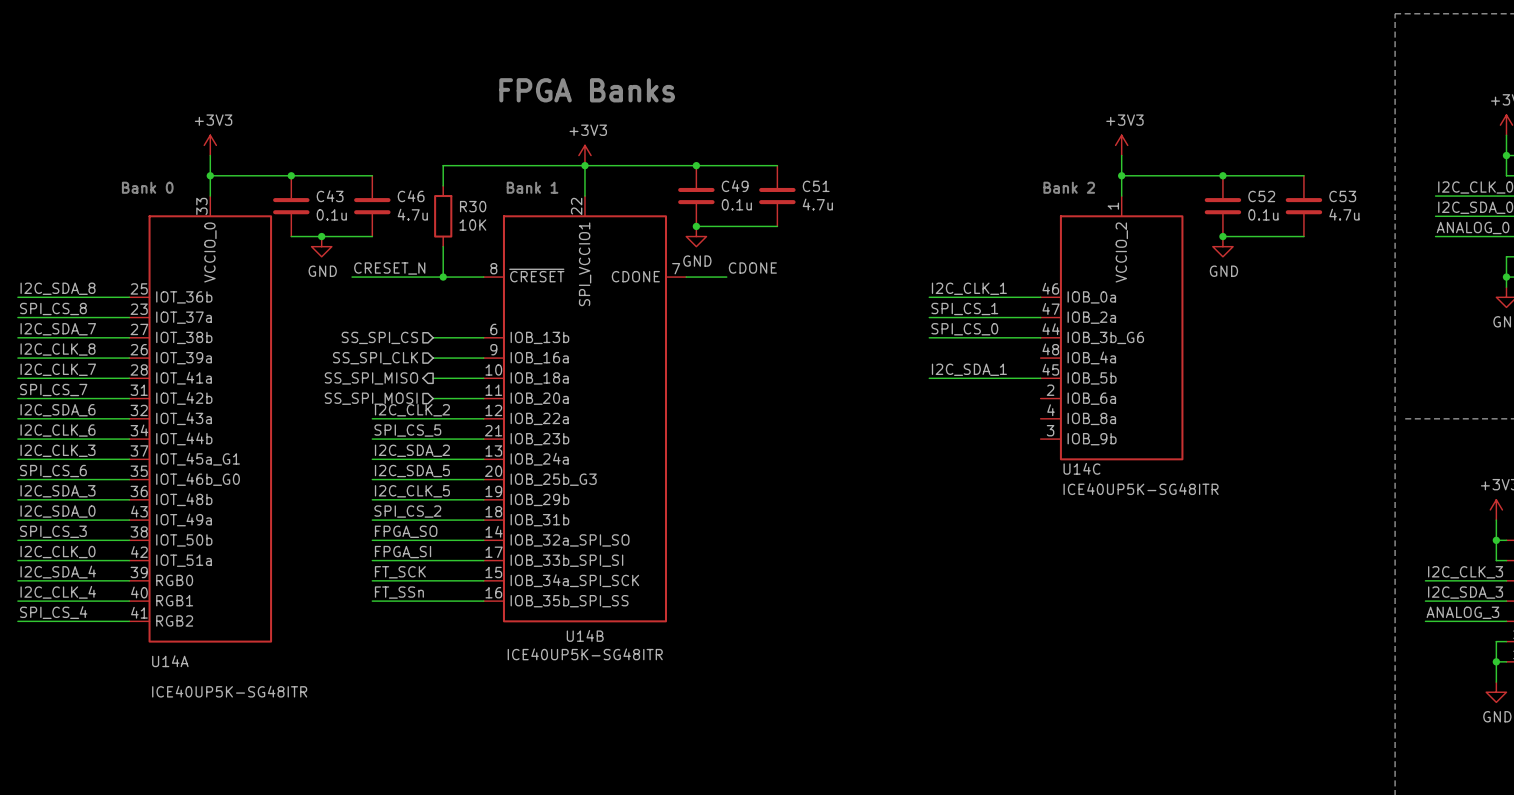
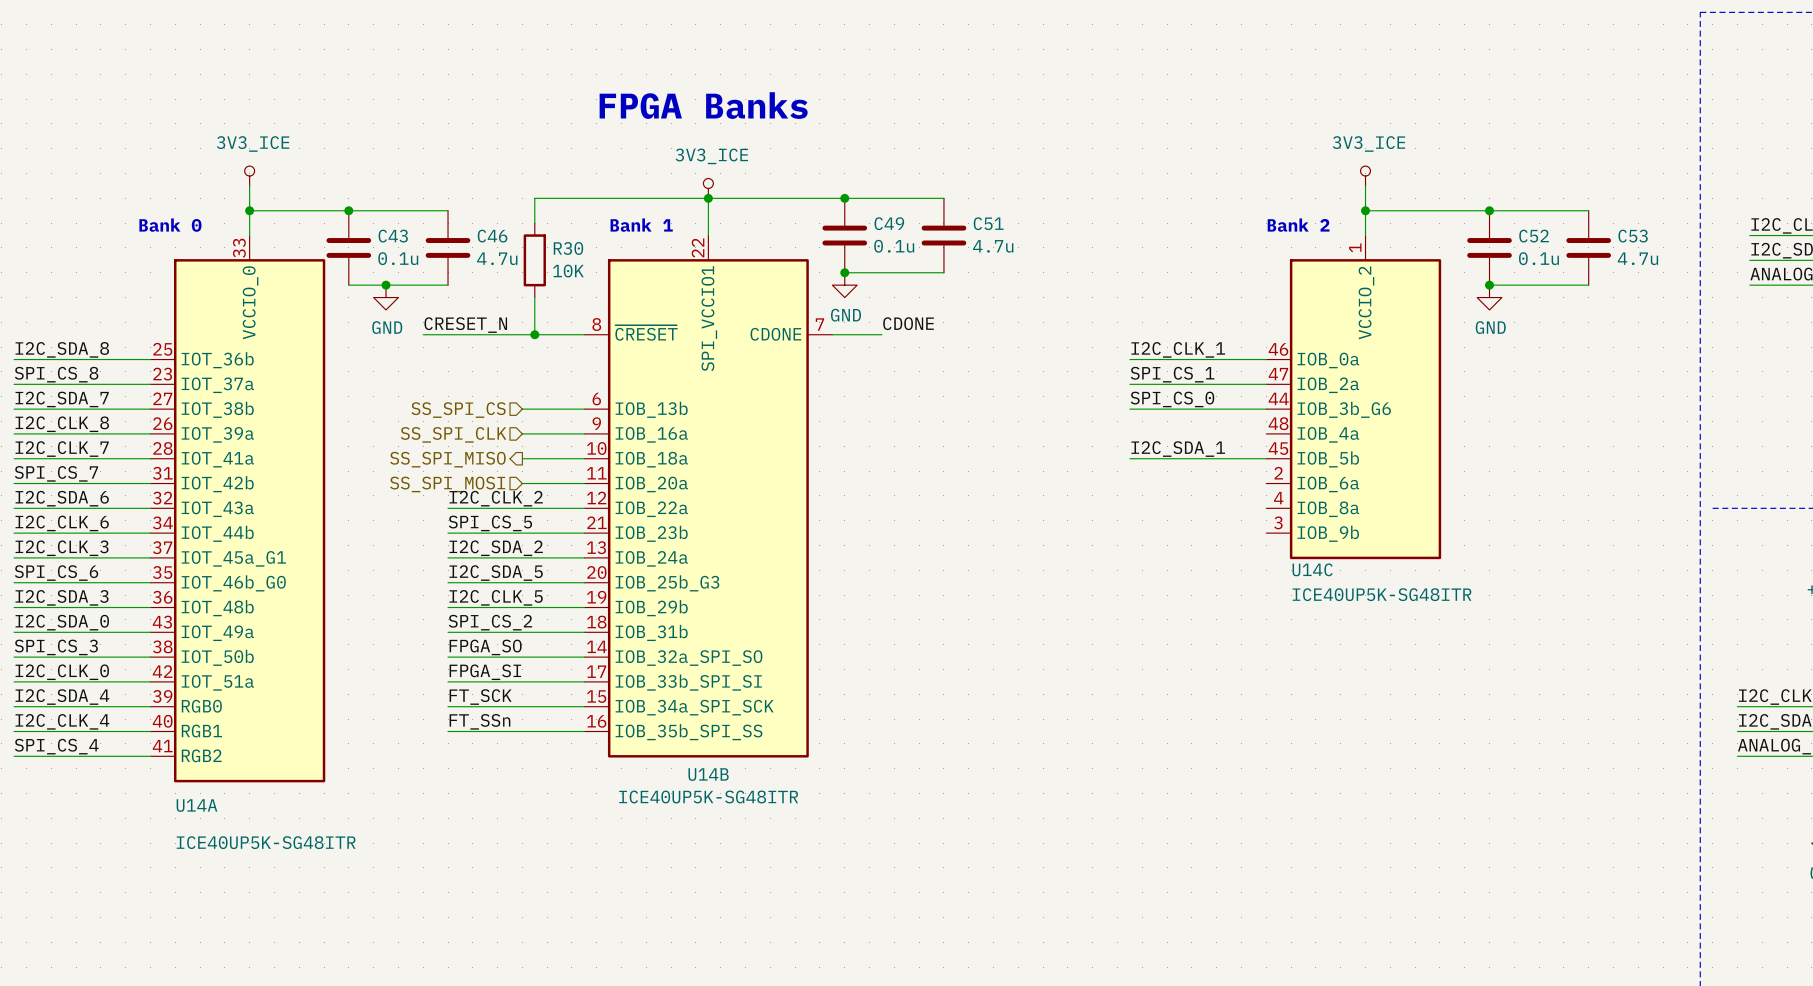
power symbol: +3V3 (210, 145) -> 3V3_ICE (249, 176)
power symbol: +3V3 (1121, 145) -> 3V3_ICE (1365, 176)
power symbol: +3V3 (584, 155) -> 3V3_ICE (708, 188)

